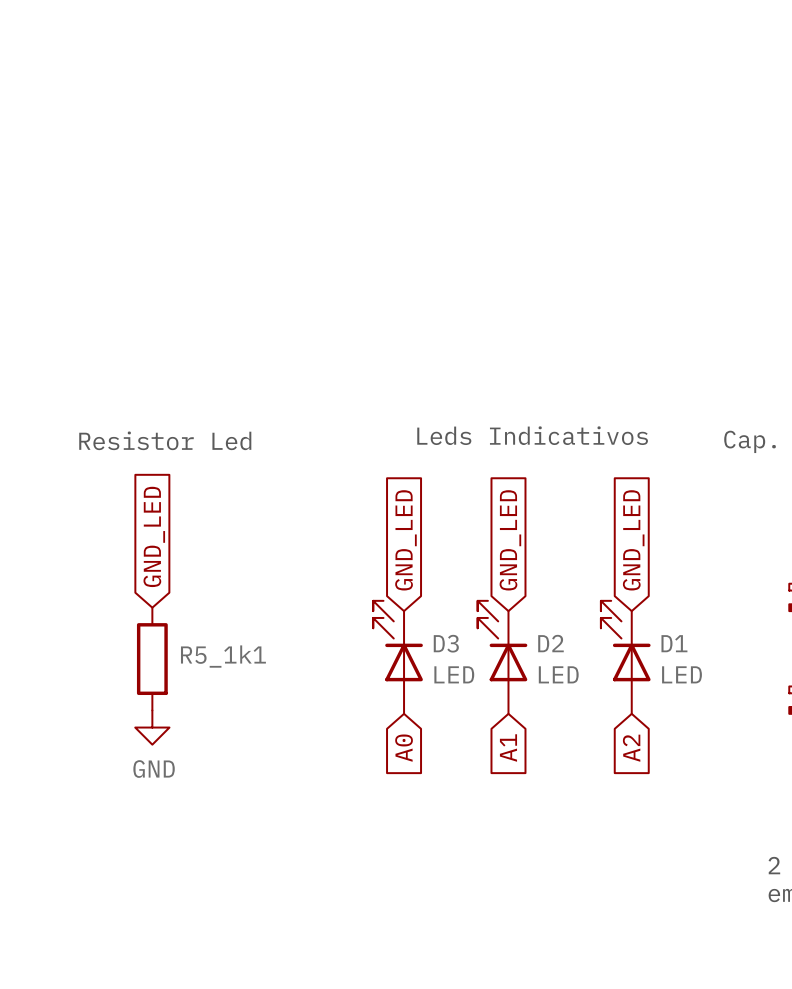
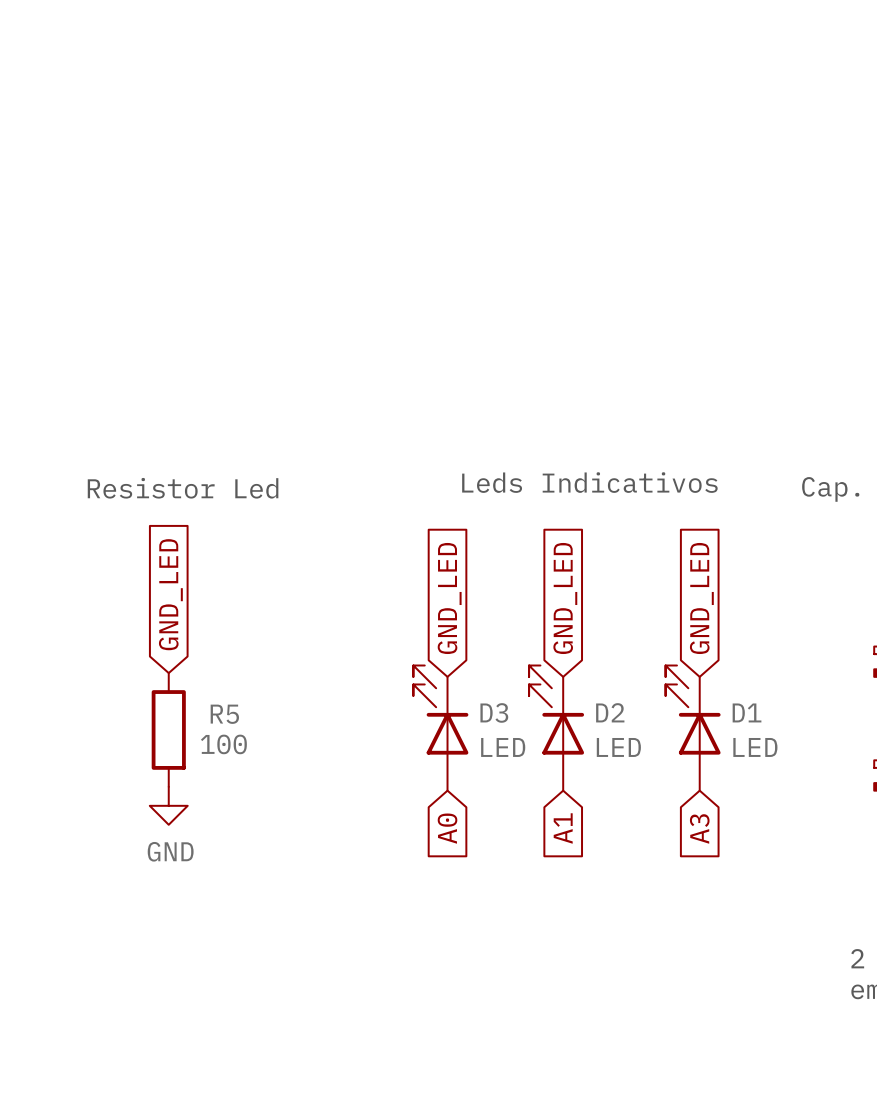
R5_1k1 name: R5_1k1 (223, 656) -> R5 (224, 714)
R5_1k1 value: none -> 100 (223, 744)
global label: A2 (631, 748) -> A3 (699, 828)

